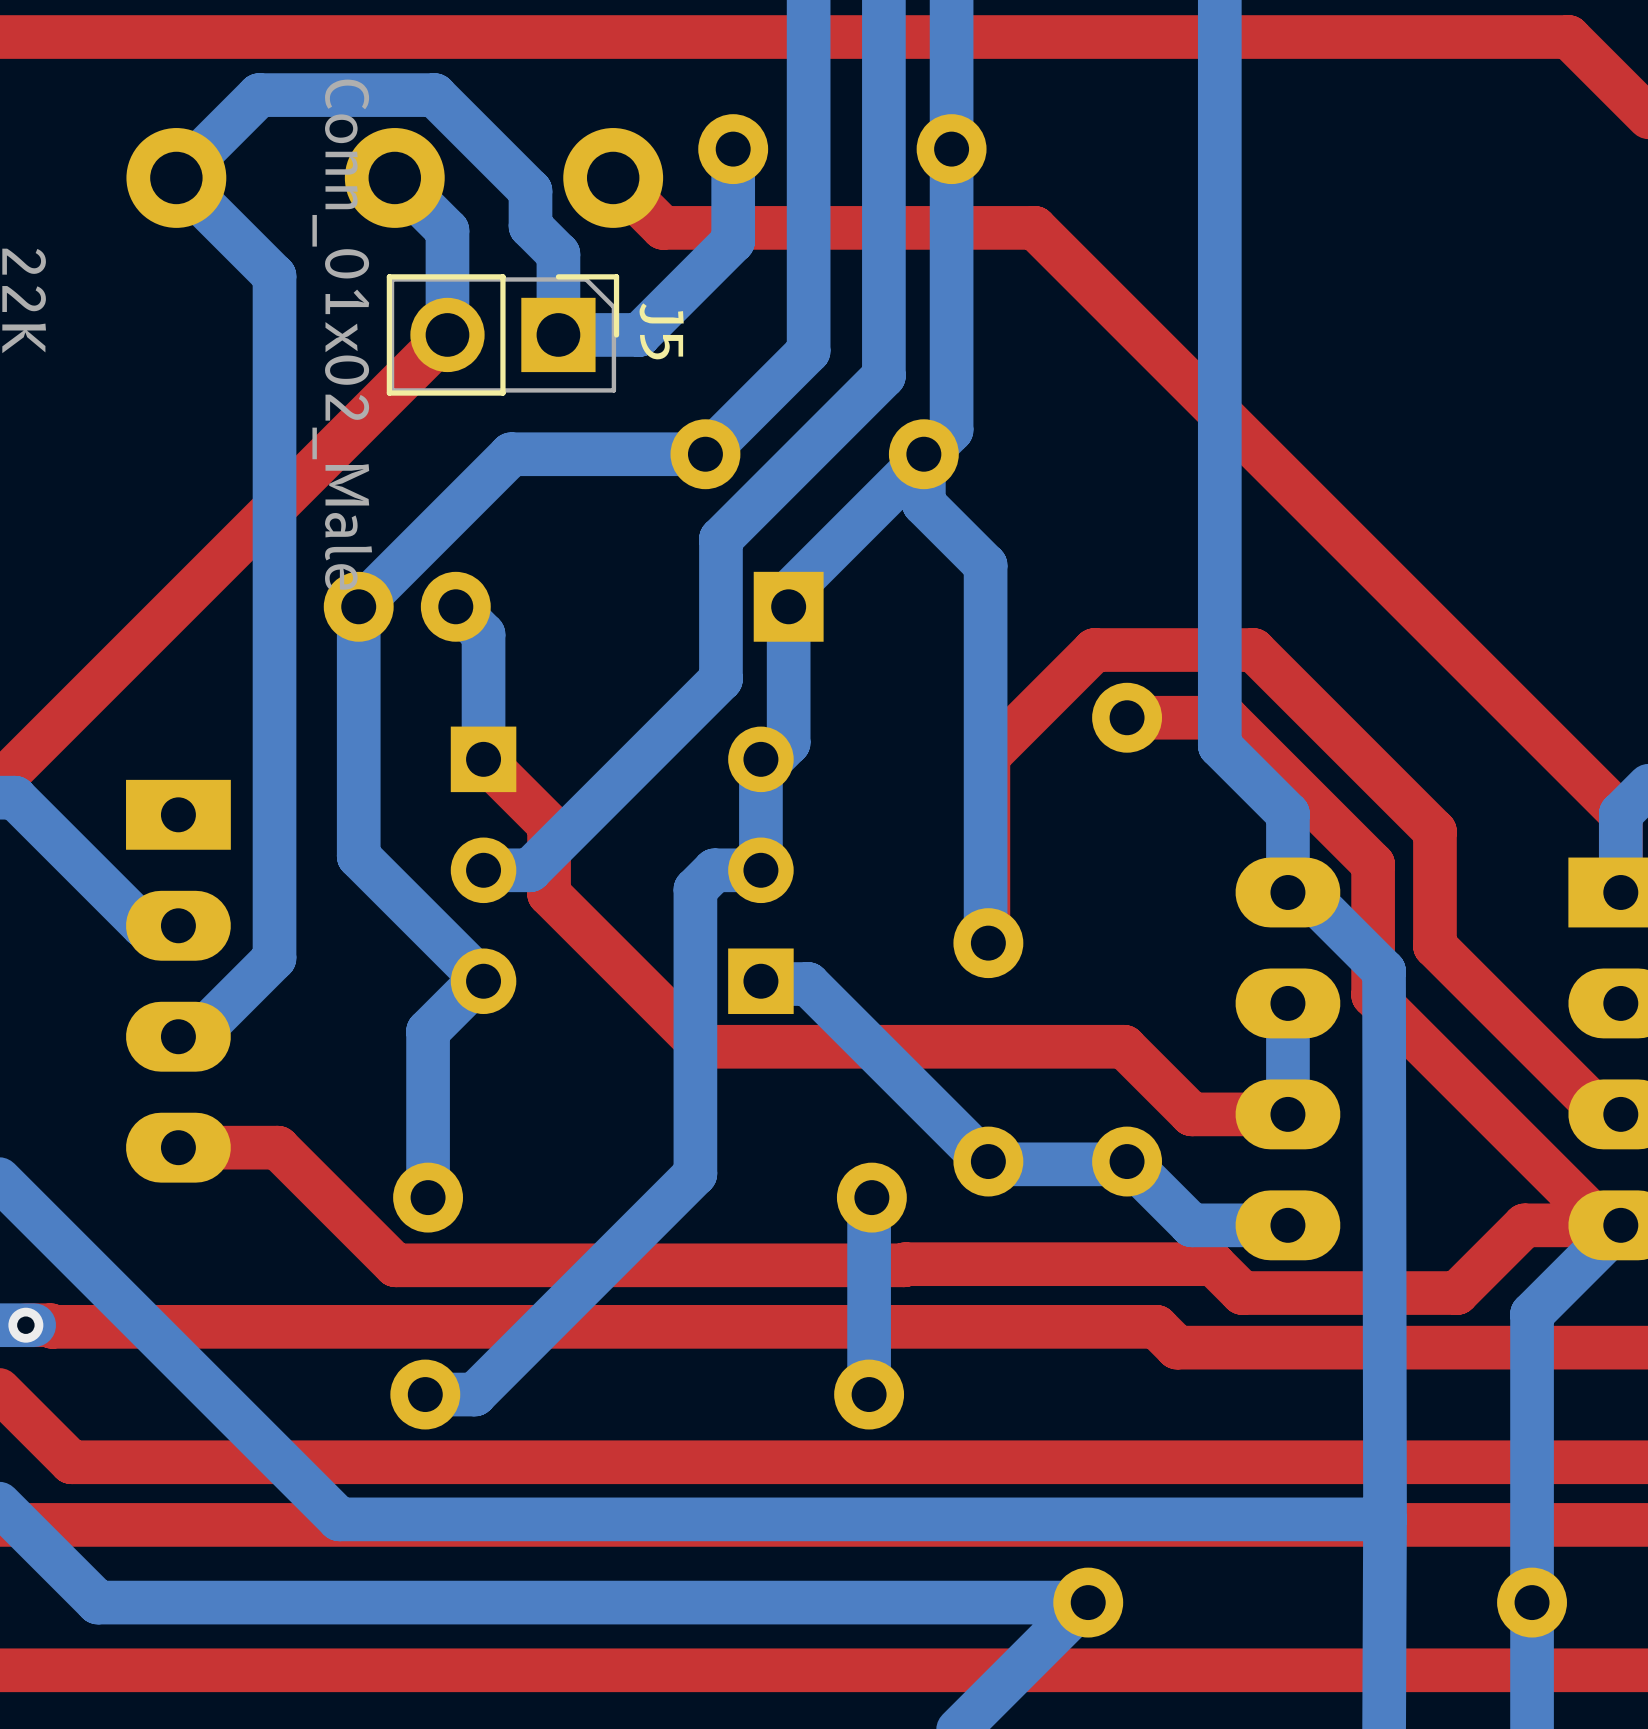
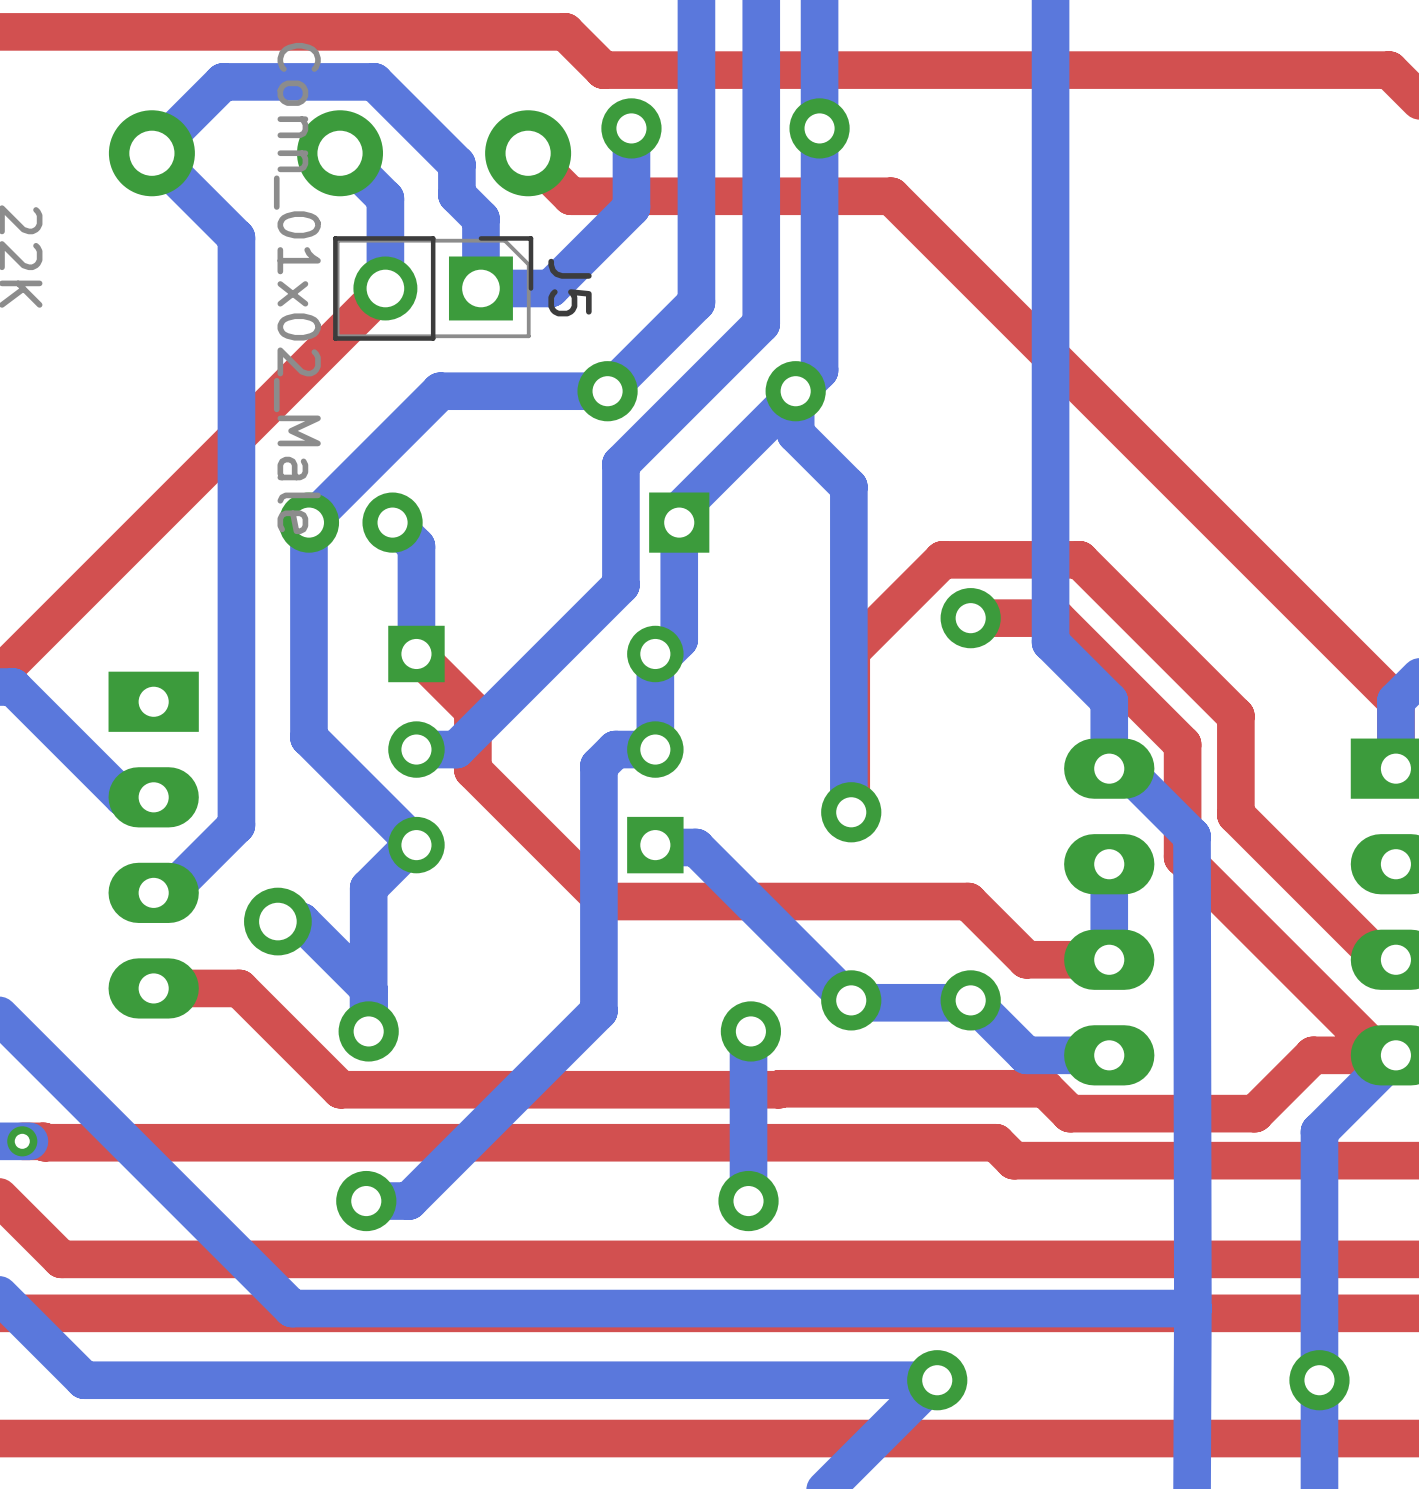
top track: (656, 37) (1568, 37) (1613, 81) -> (565, 31) (603, 70) (1389, 70)
bottom track: none -> (277, 921) (301, 921) (368, 988)
via: none -> (277, 921)

